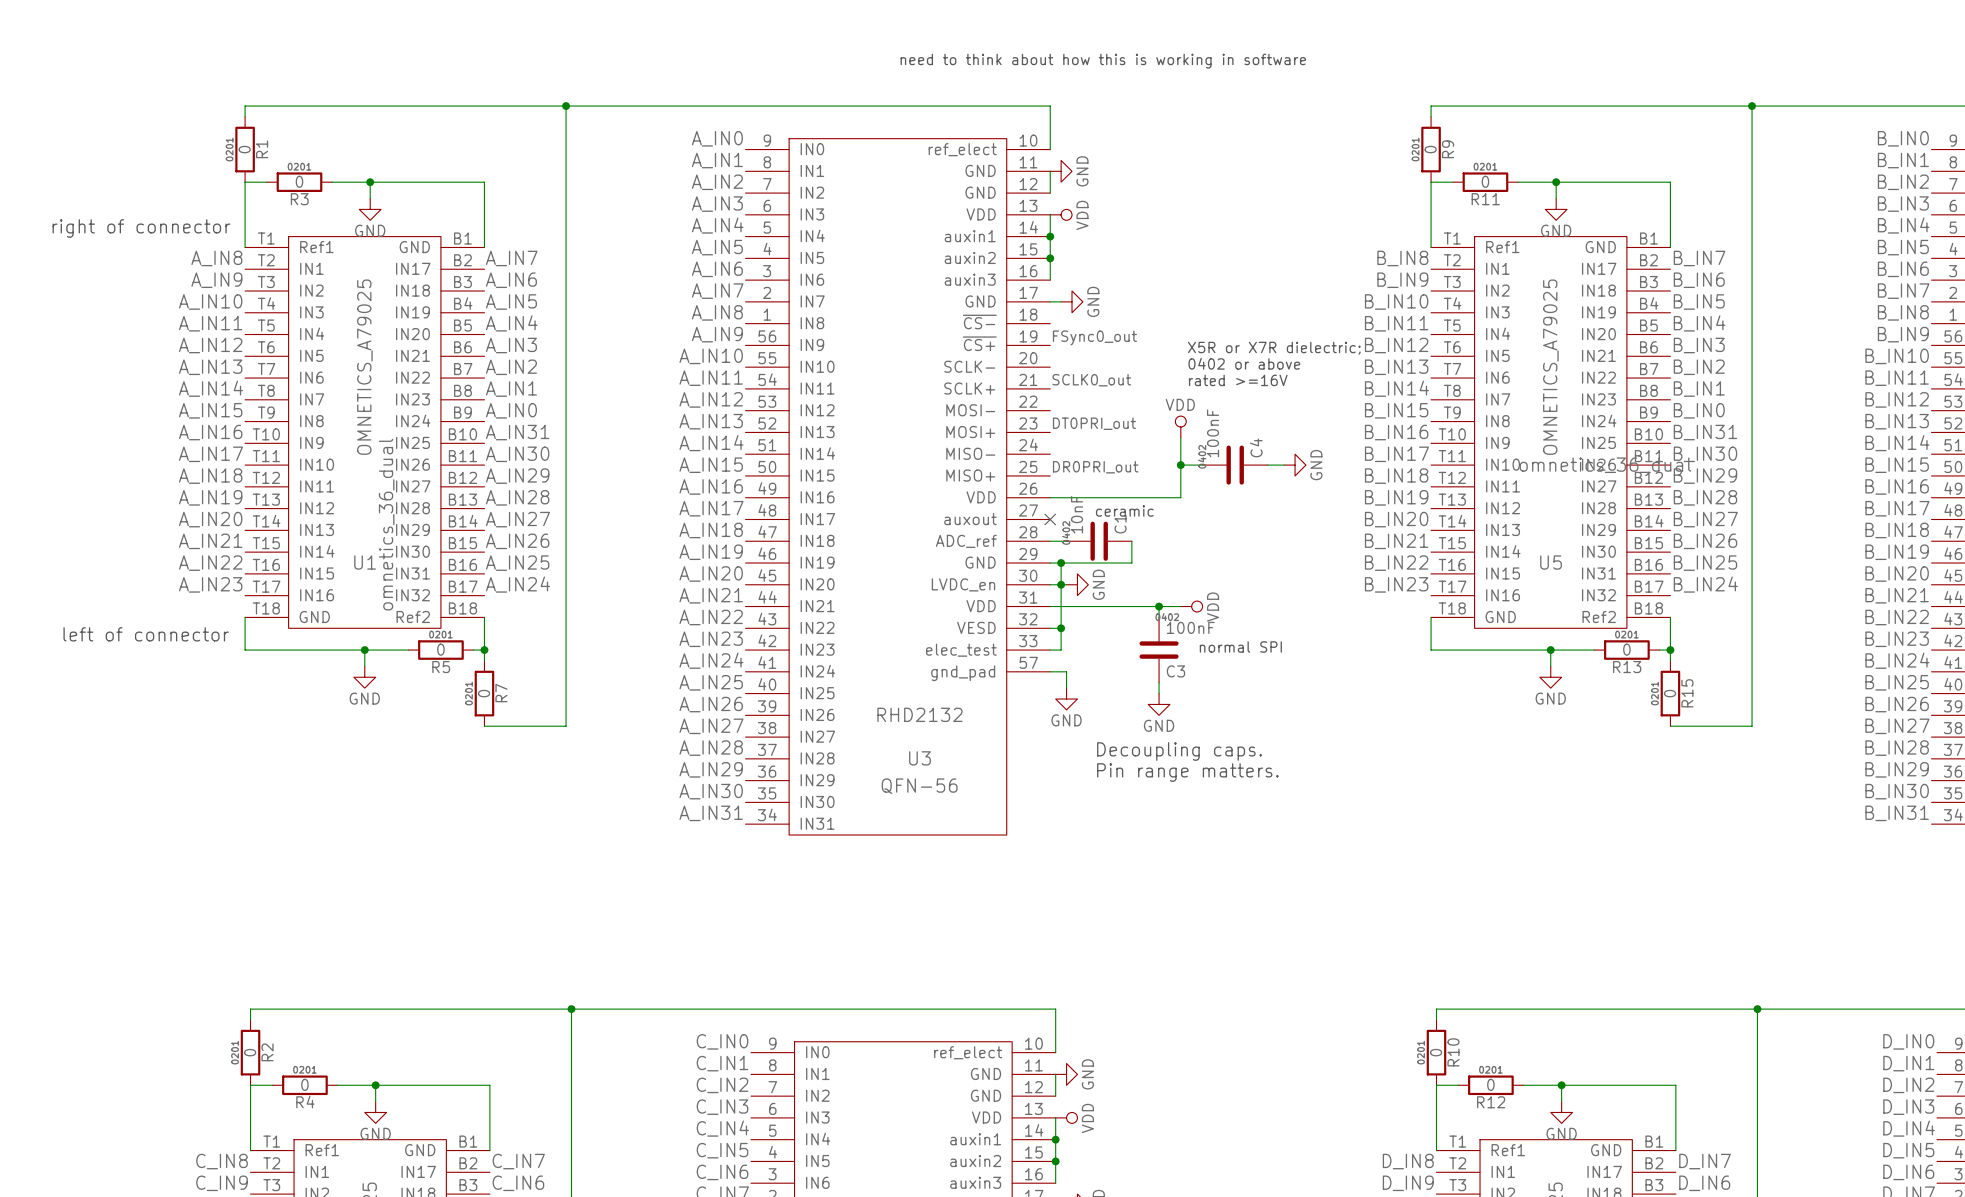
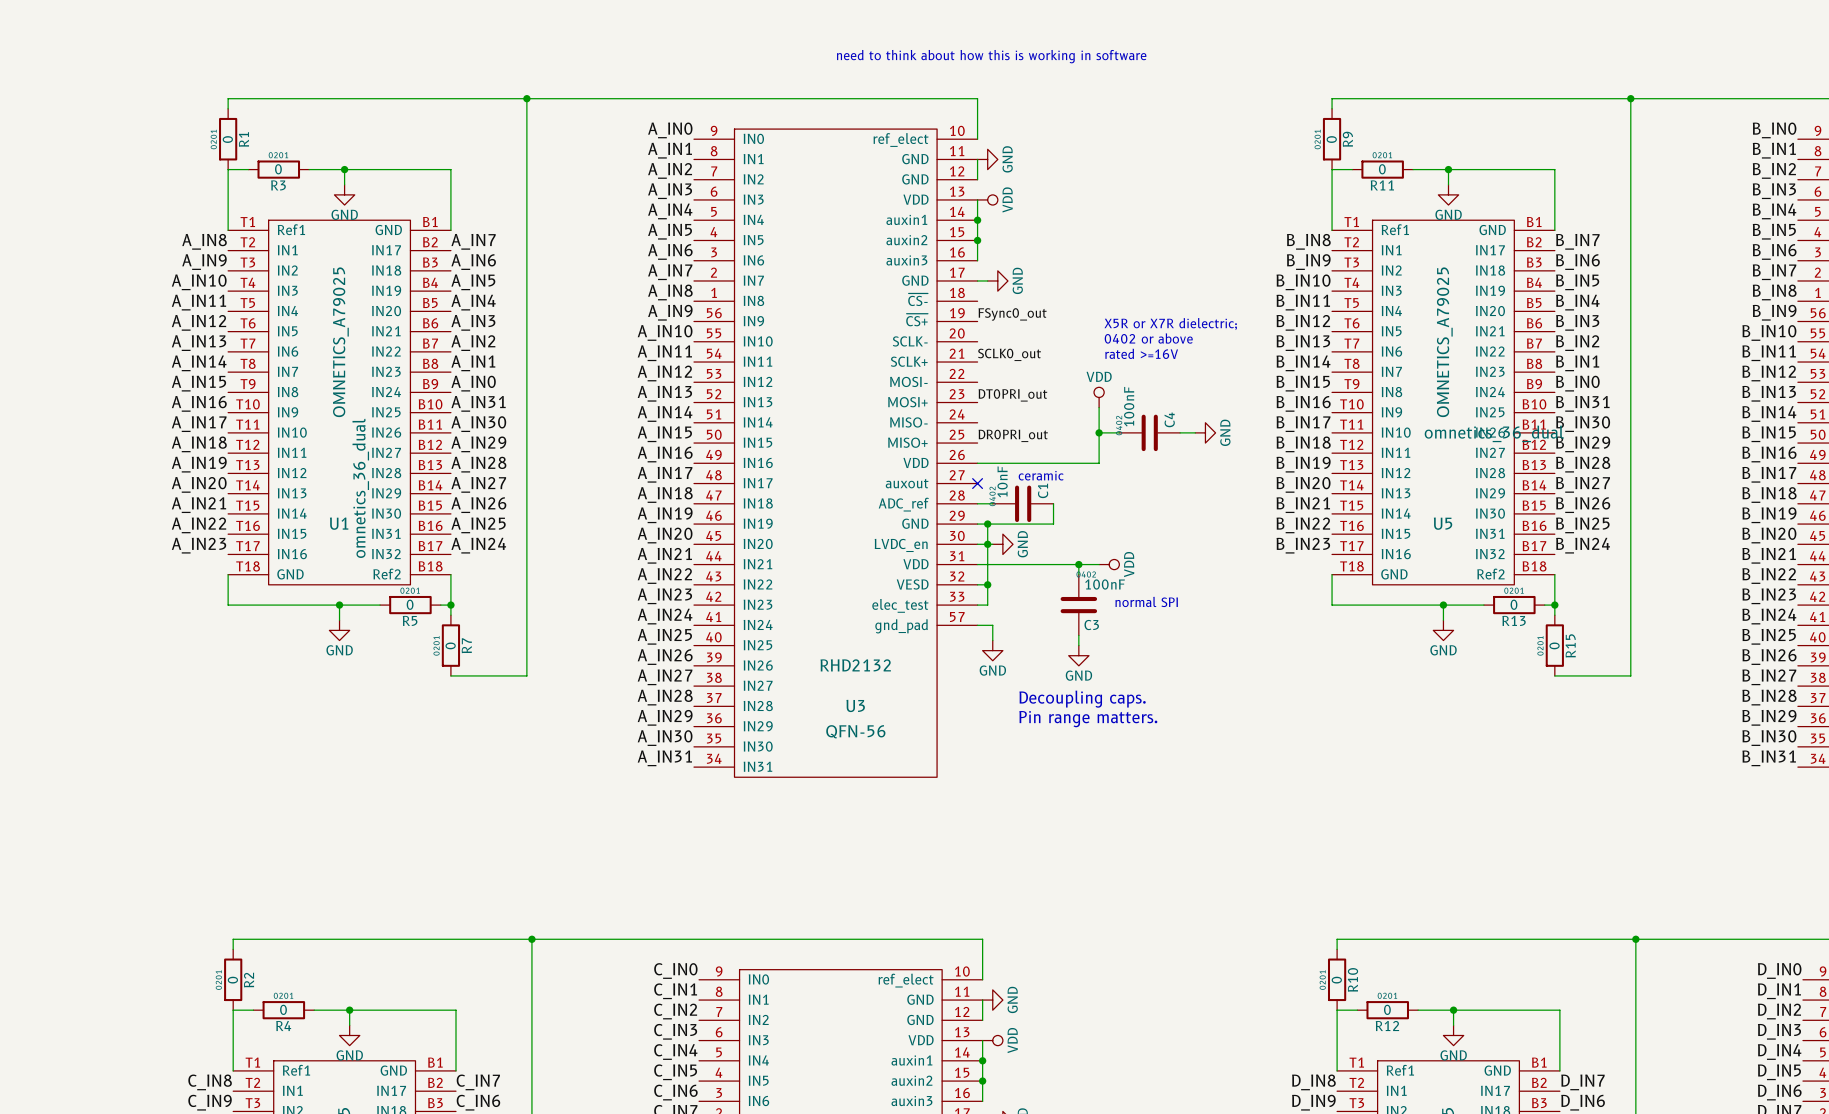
text: right of connector (141, 228) -> none
text: left of connector (146, 634) -> none

